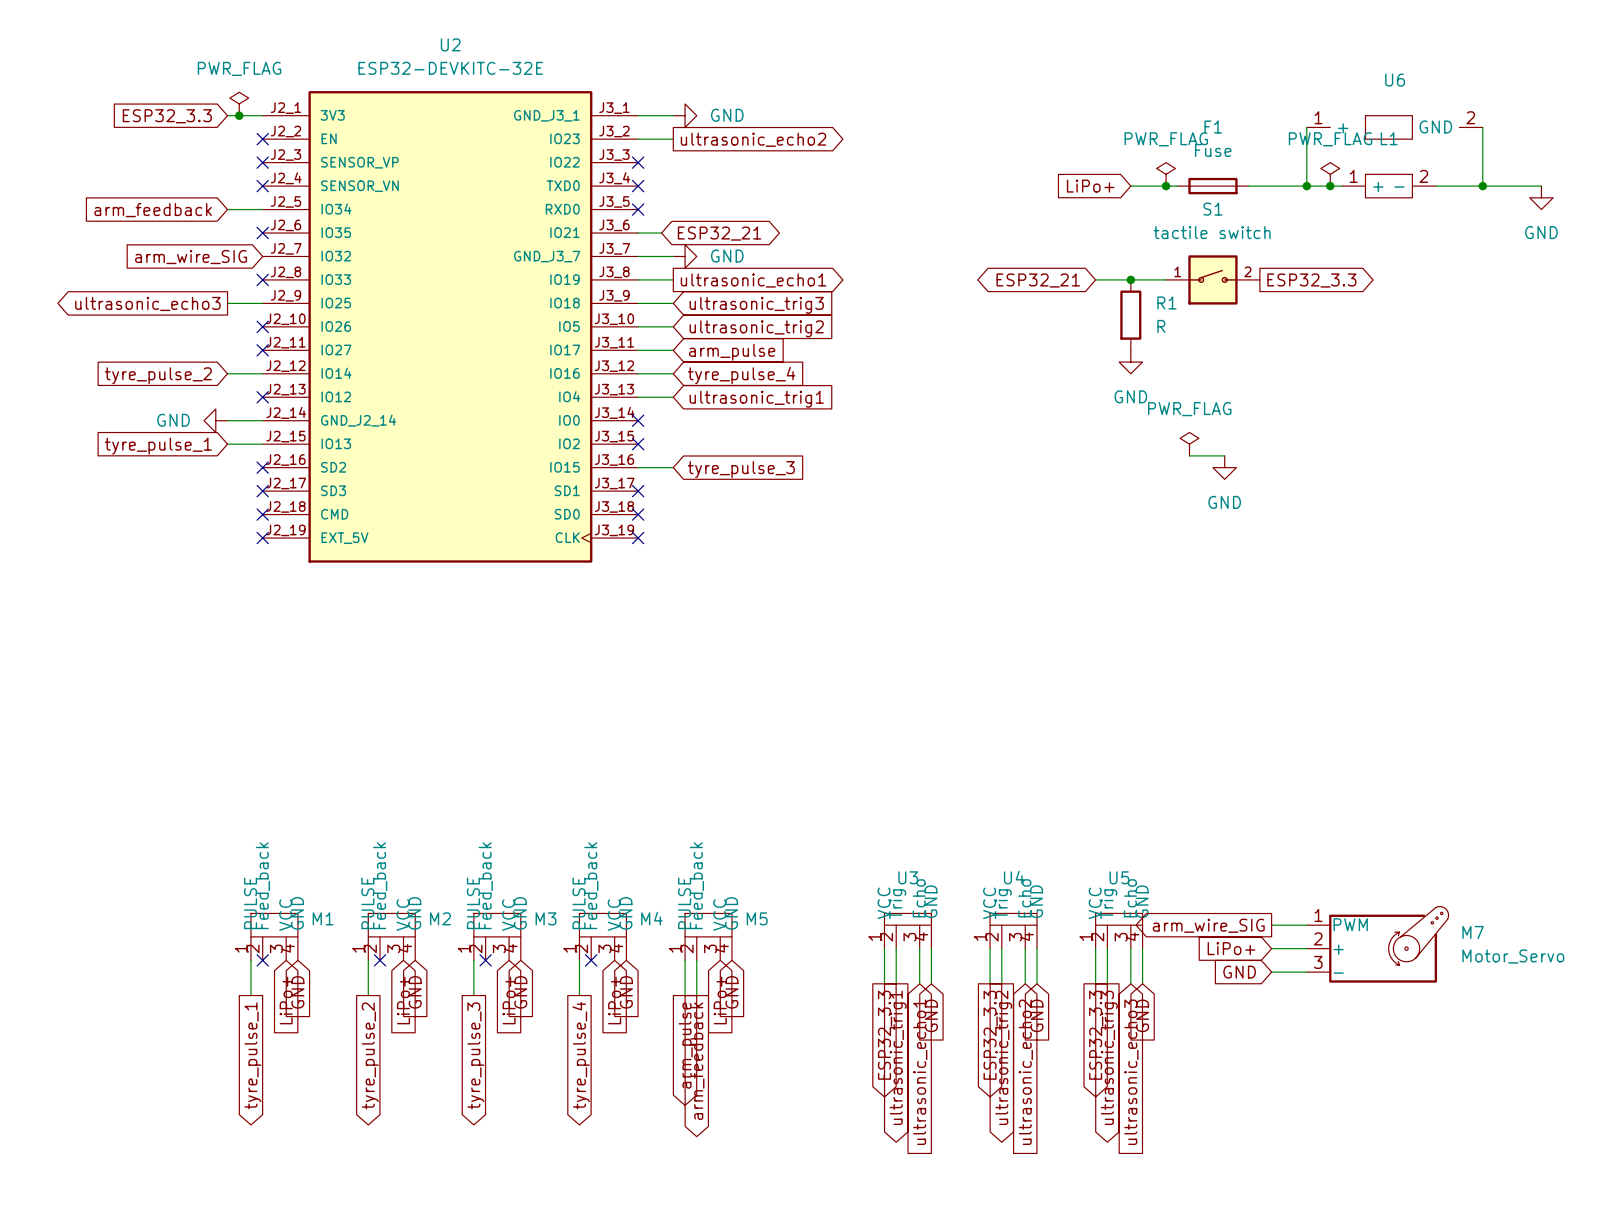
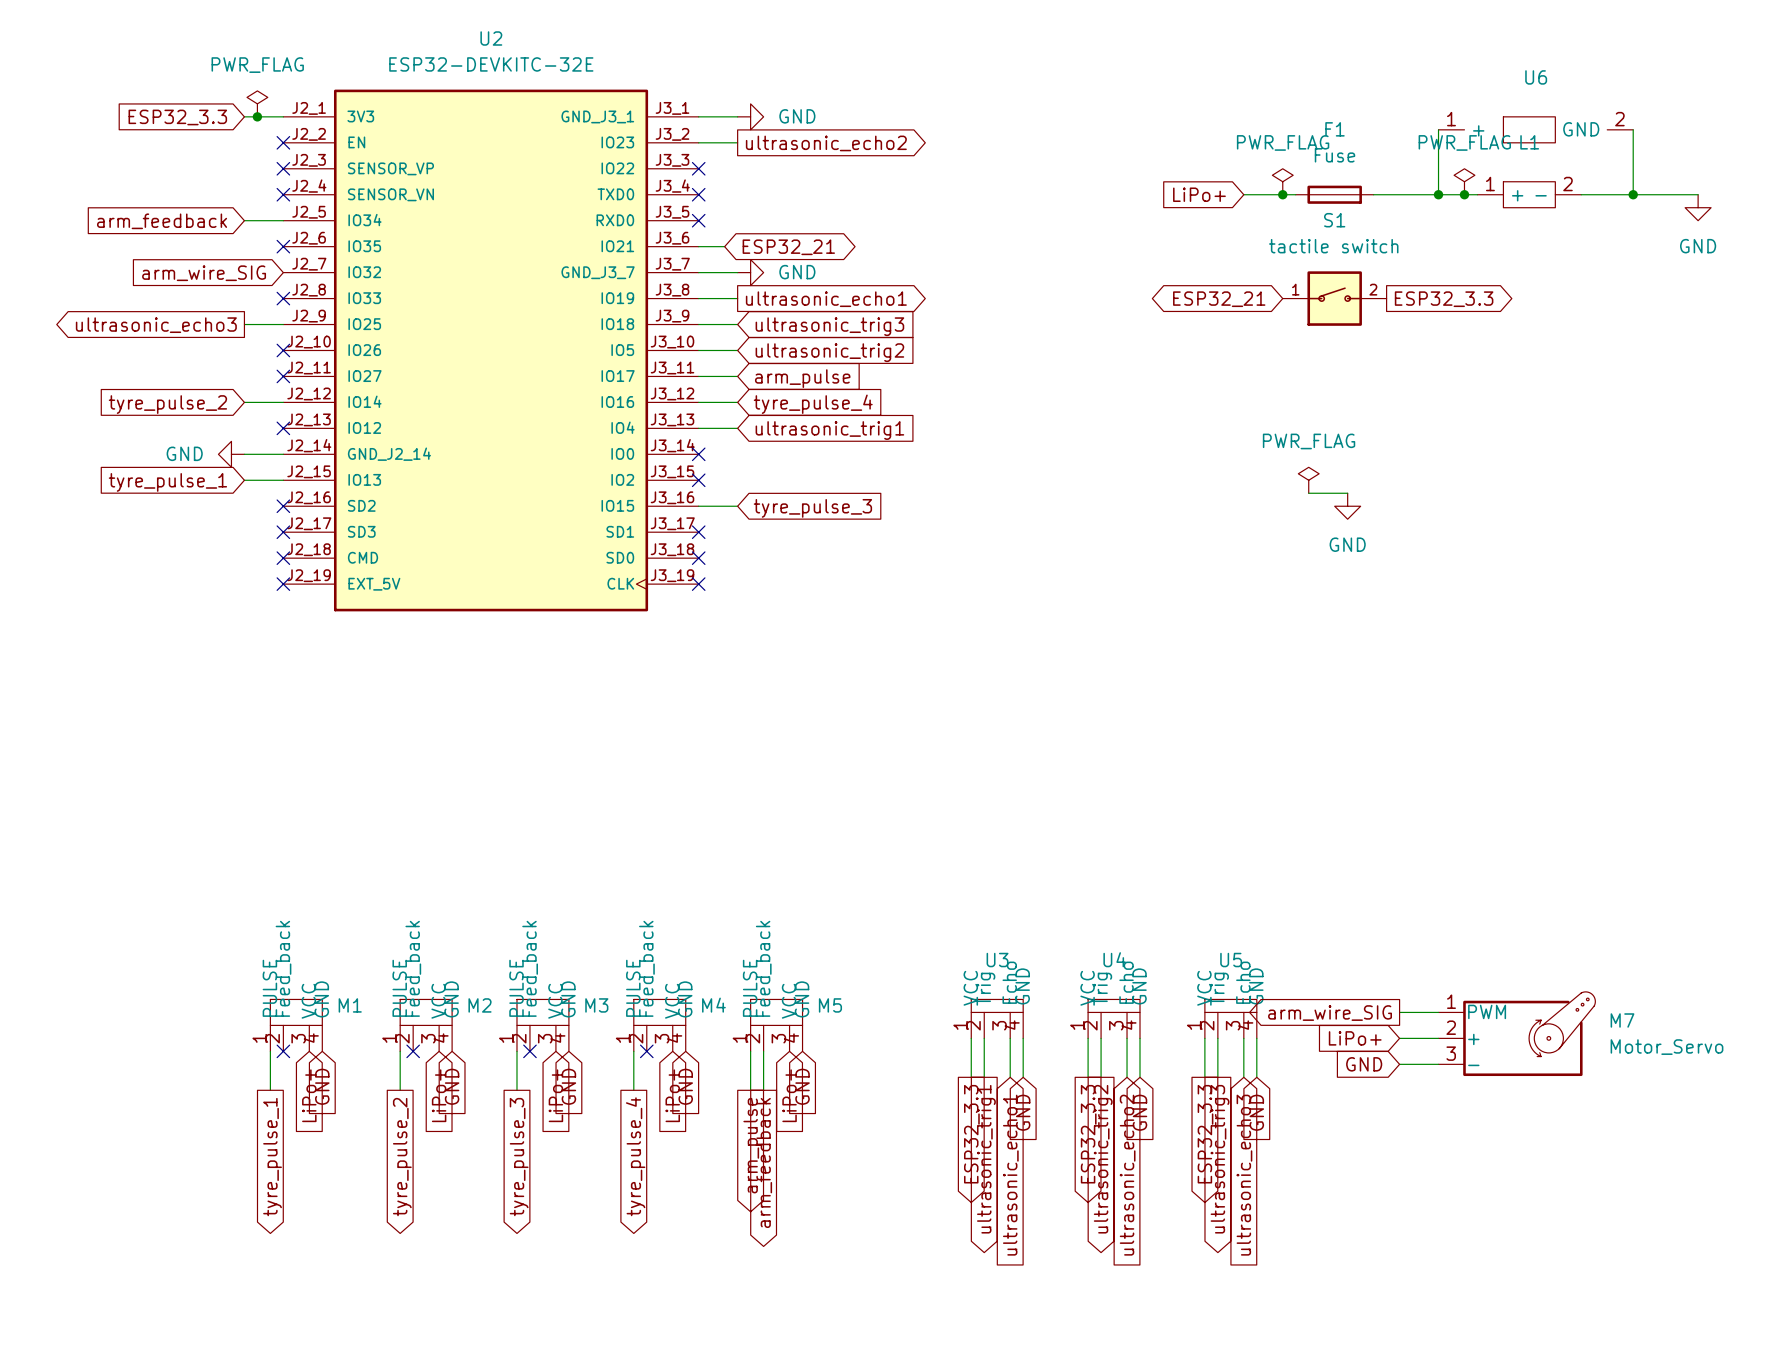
wire: (1095, 279) (1166, 279) -> none
junction: (1130, 279) -> none
global label position: ESP32_21 (1038, 280) -> ESP32_21 (1219, 299)
R1: R (1130, 315) -> none
power symbol: GND (1130, 362) -> none

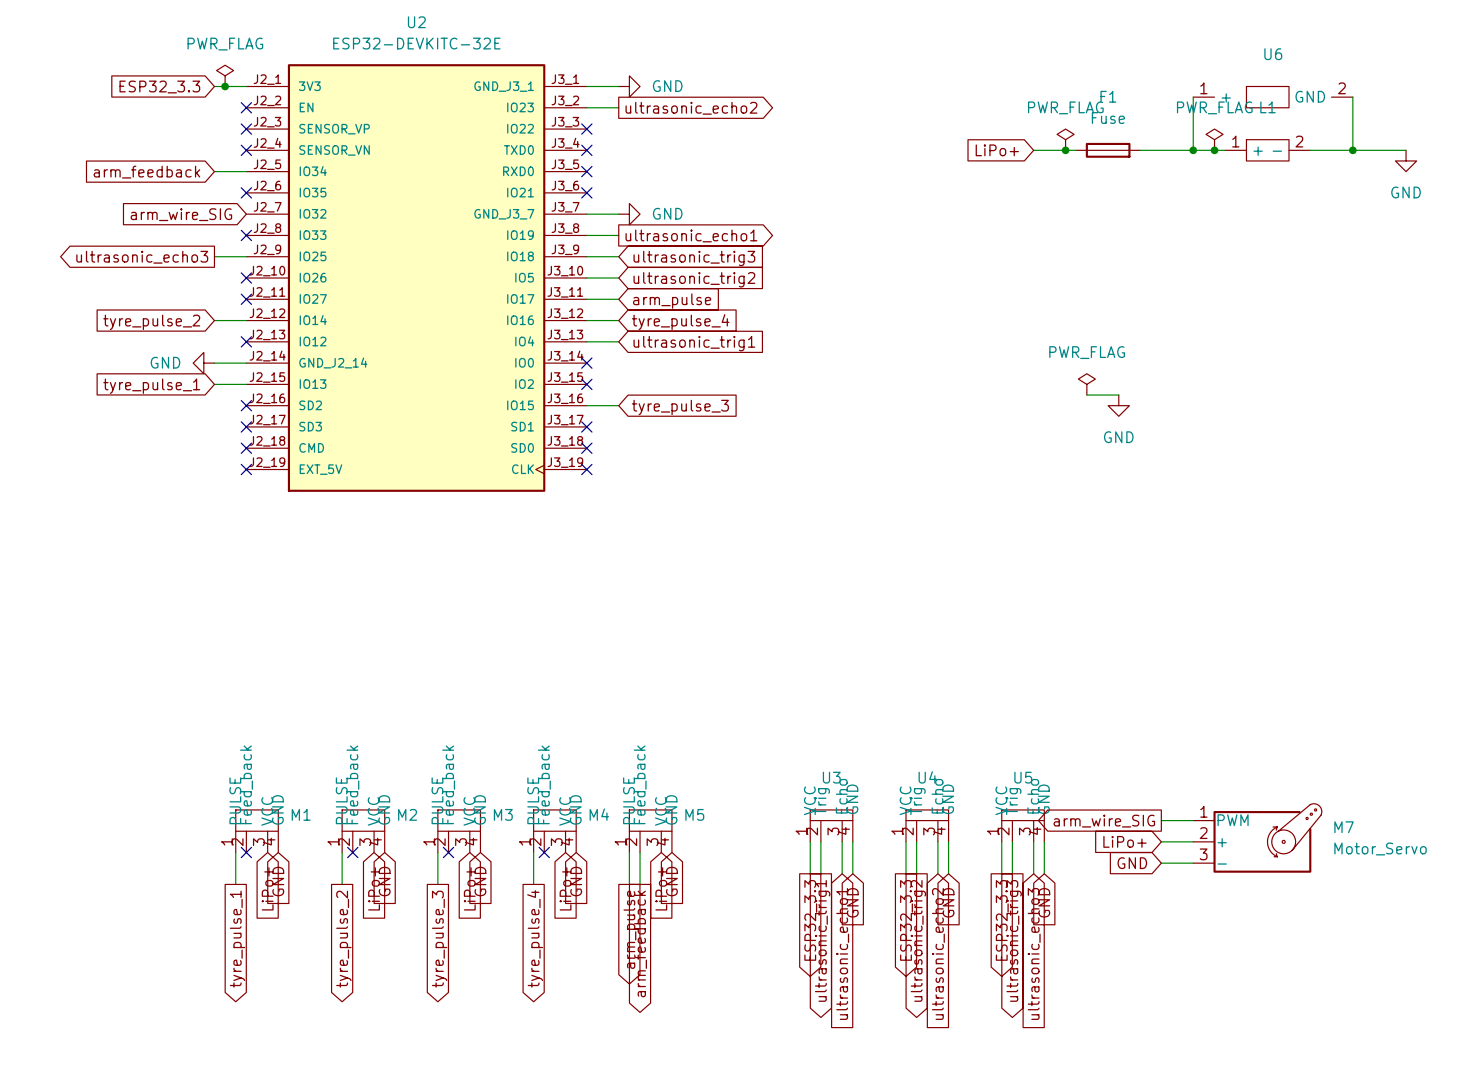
wire: (698, 246) (724, 246) -> none
no-connect mark: none -> (586, 192)
global label: ESP32_21 (788, 247) -> none
S1: tactile switch (1334, 298) -> none
global label: ESP32_21 (1219, 299) -> none
global label: ESP32_3.3 (1444, 299) -> none

